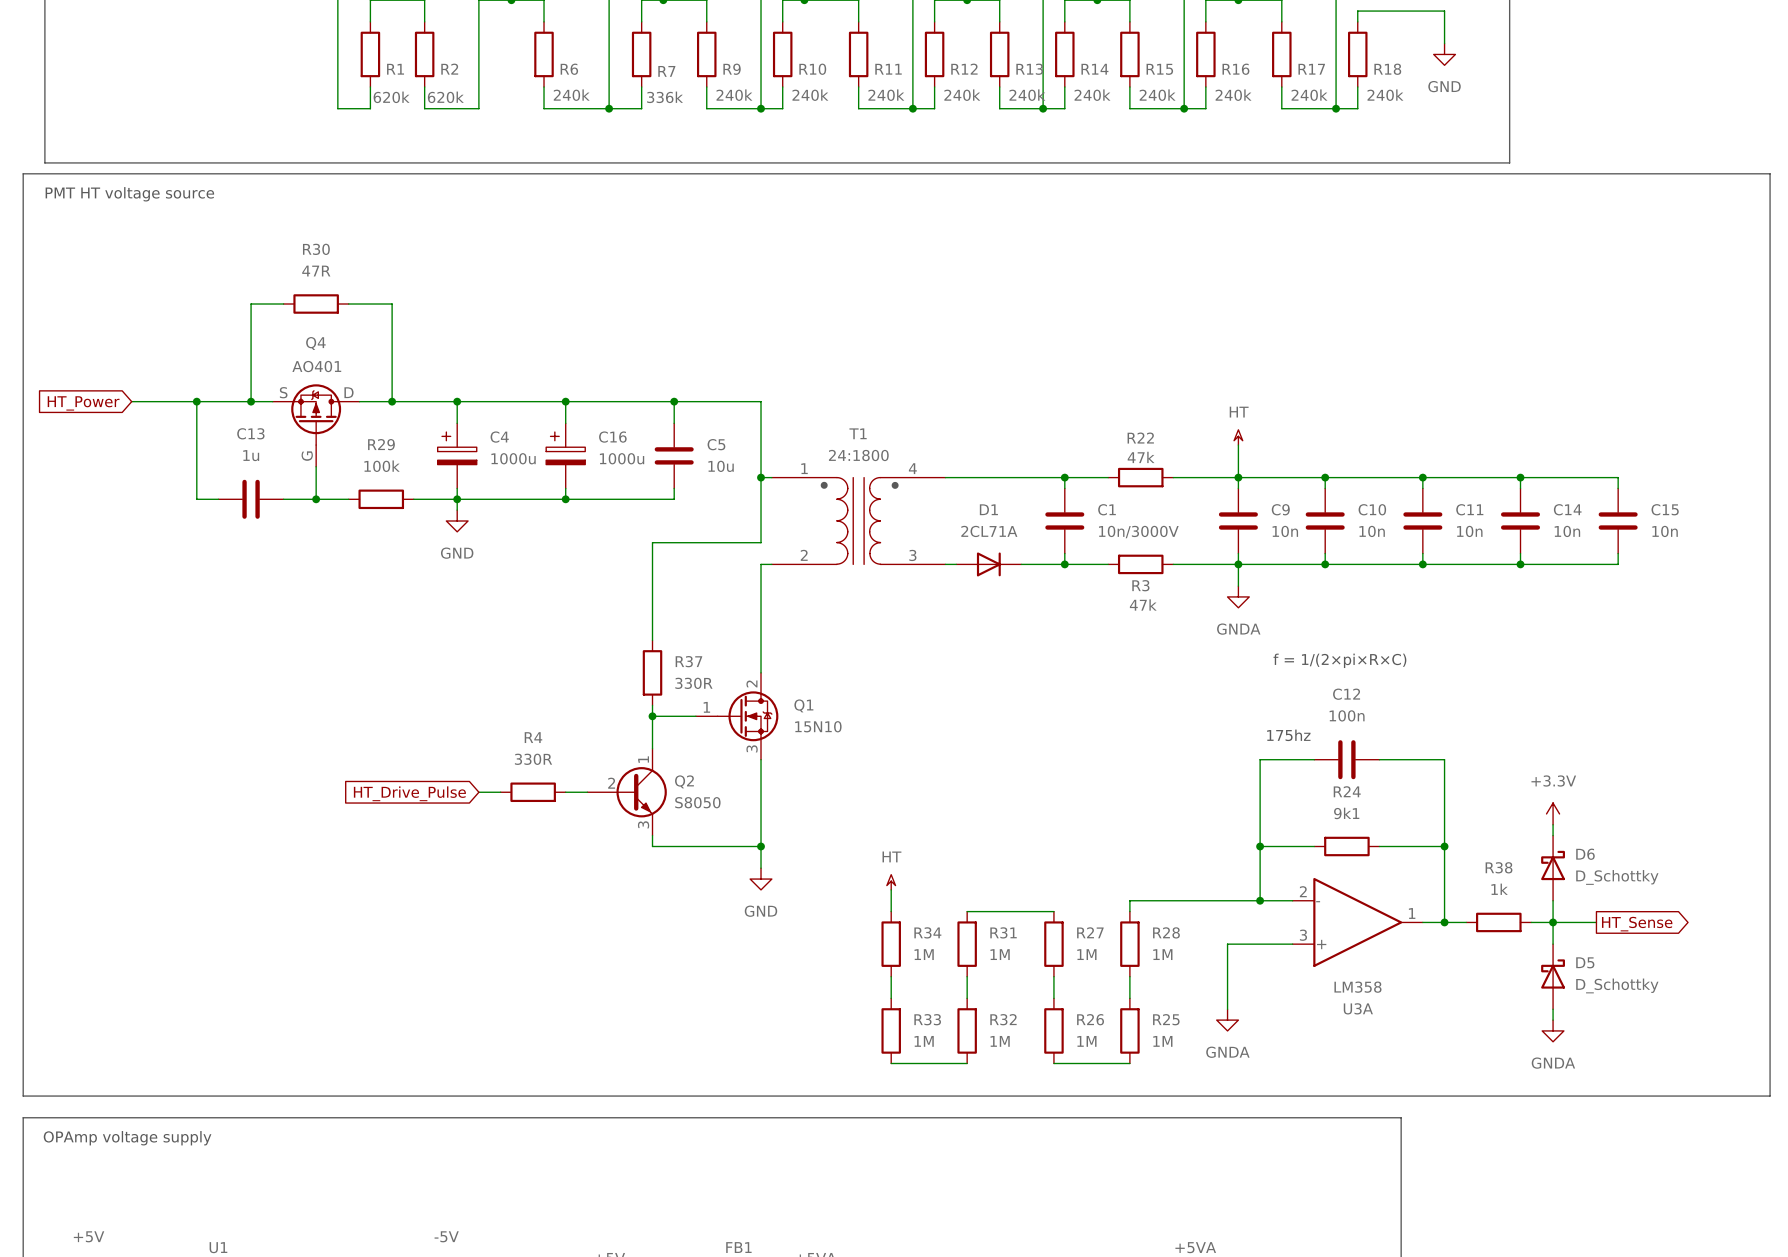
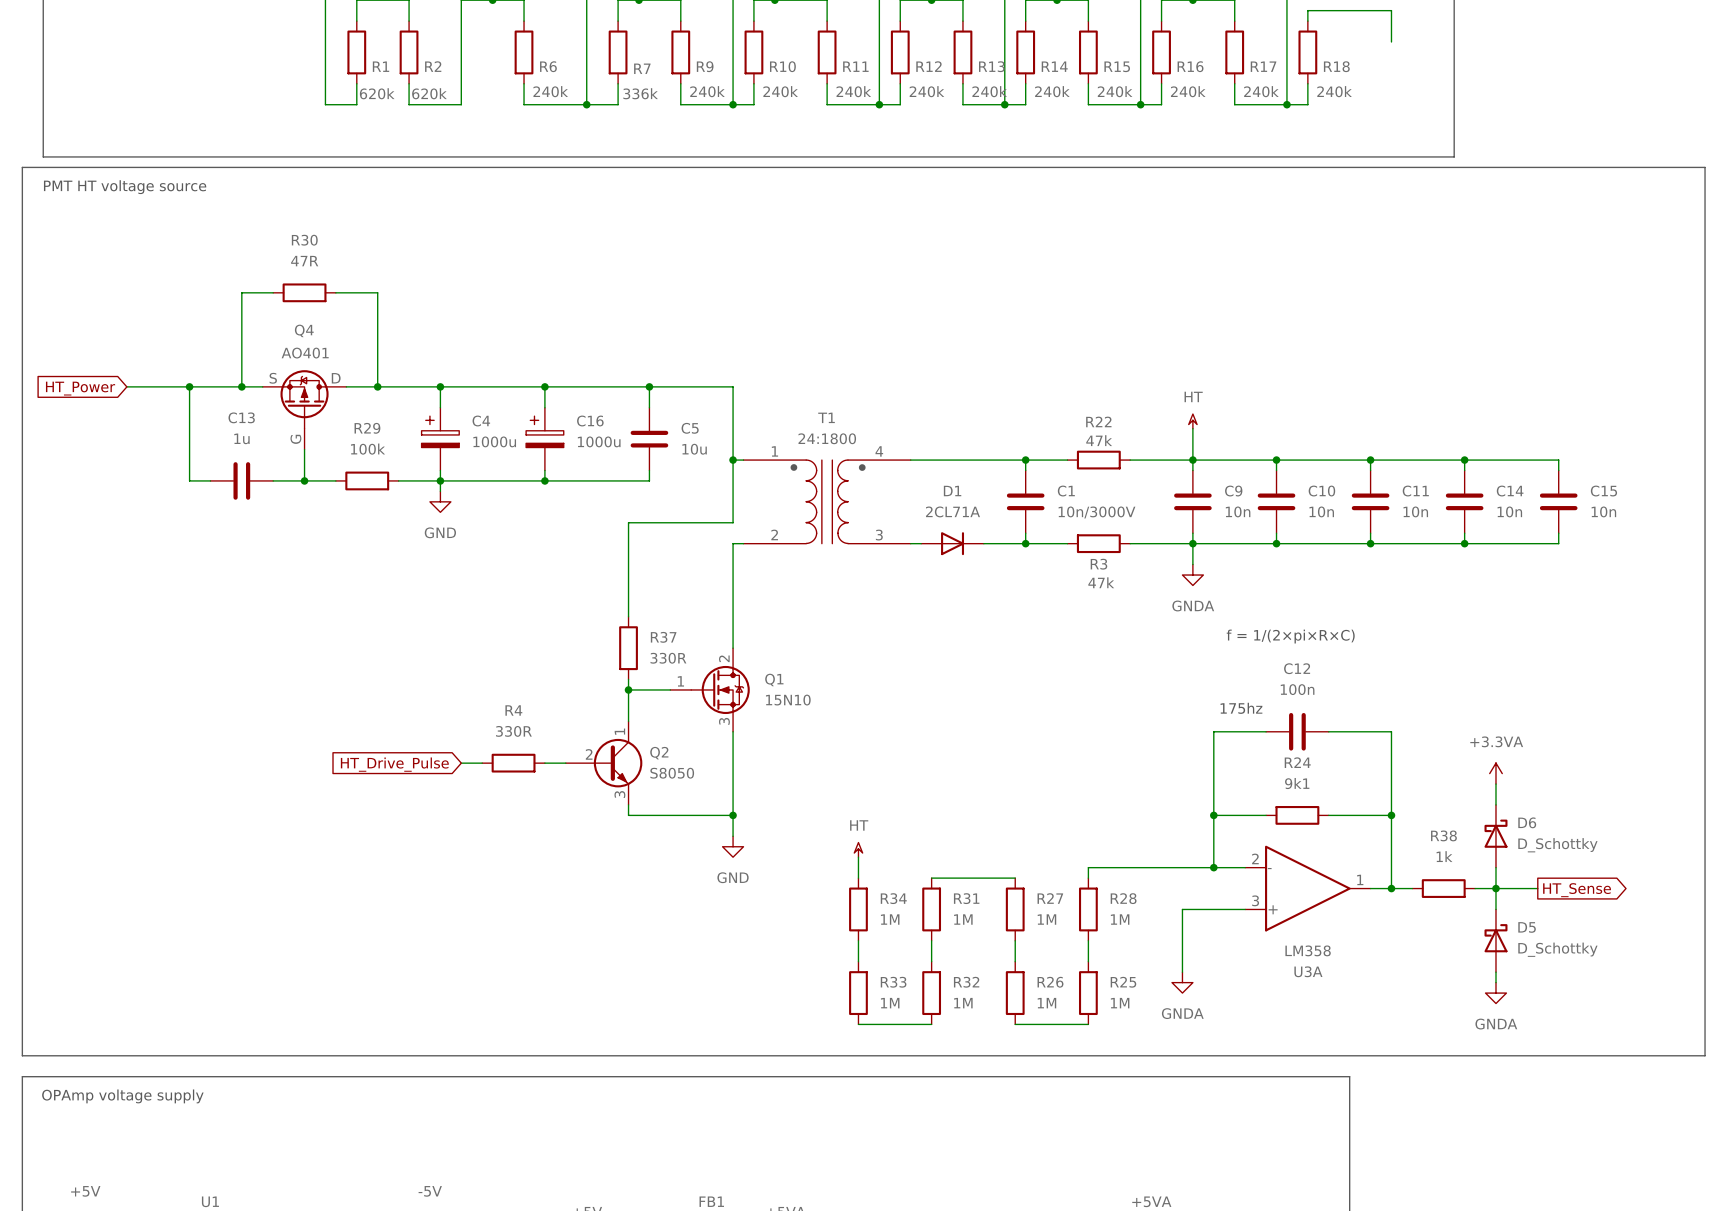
power symbol: GND (1444, 54) -> none
power symbol: none -> +3.3VA (1495, 773)
power symbol: +3.3V (1553, 813) -> none

